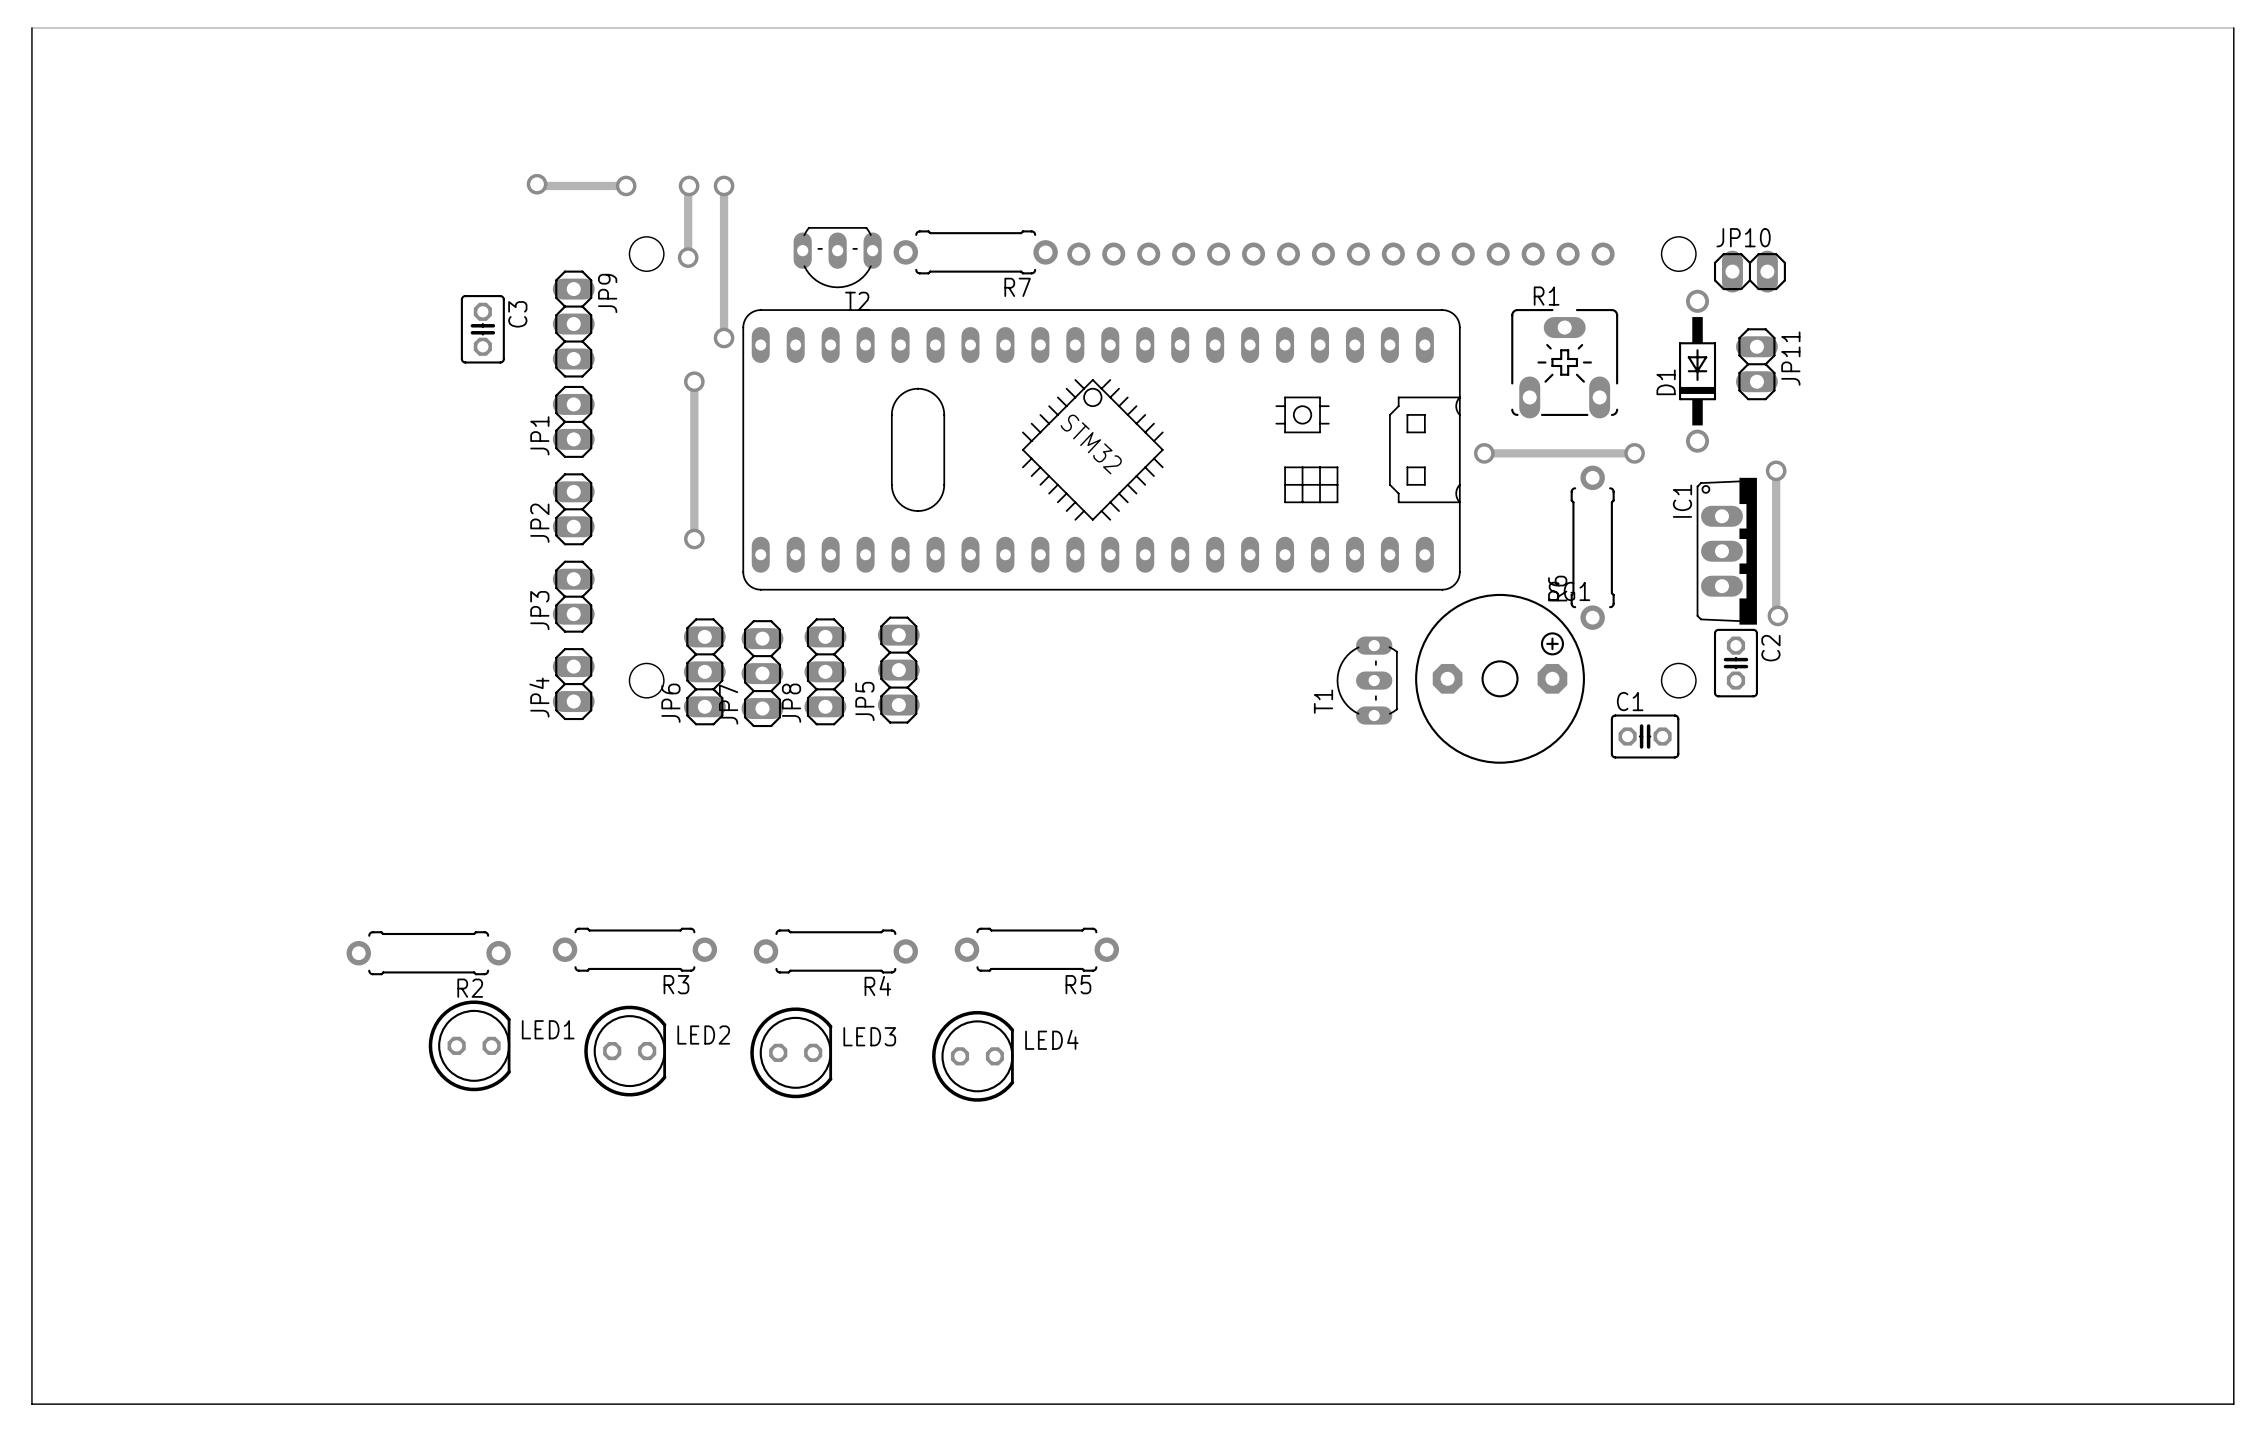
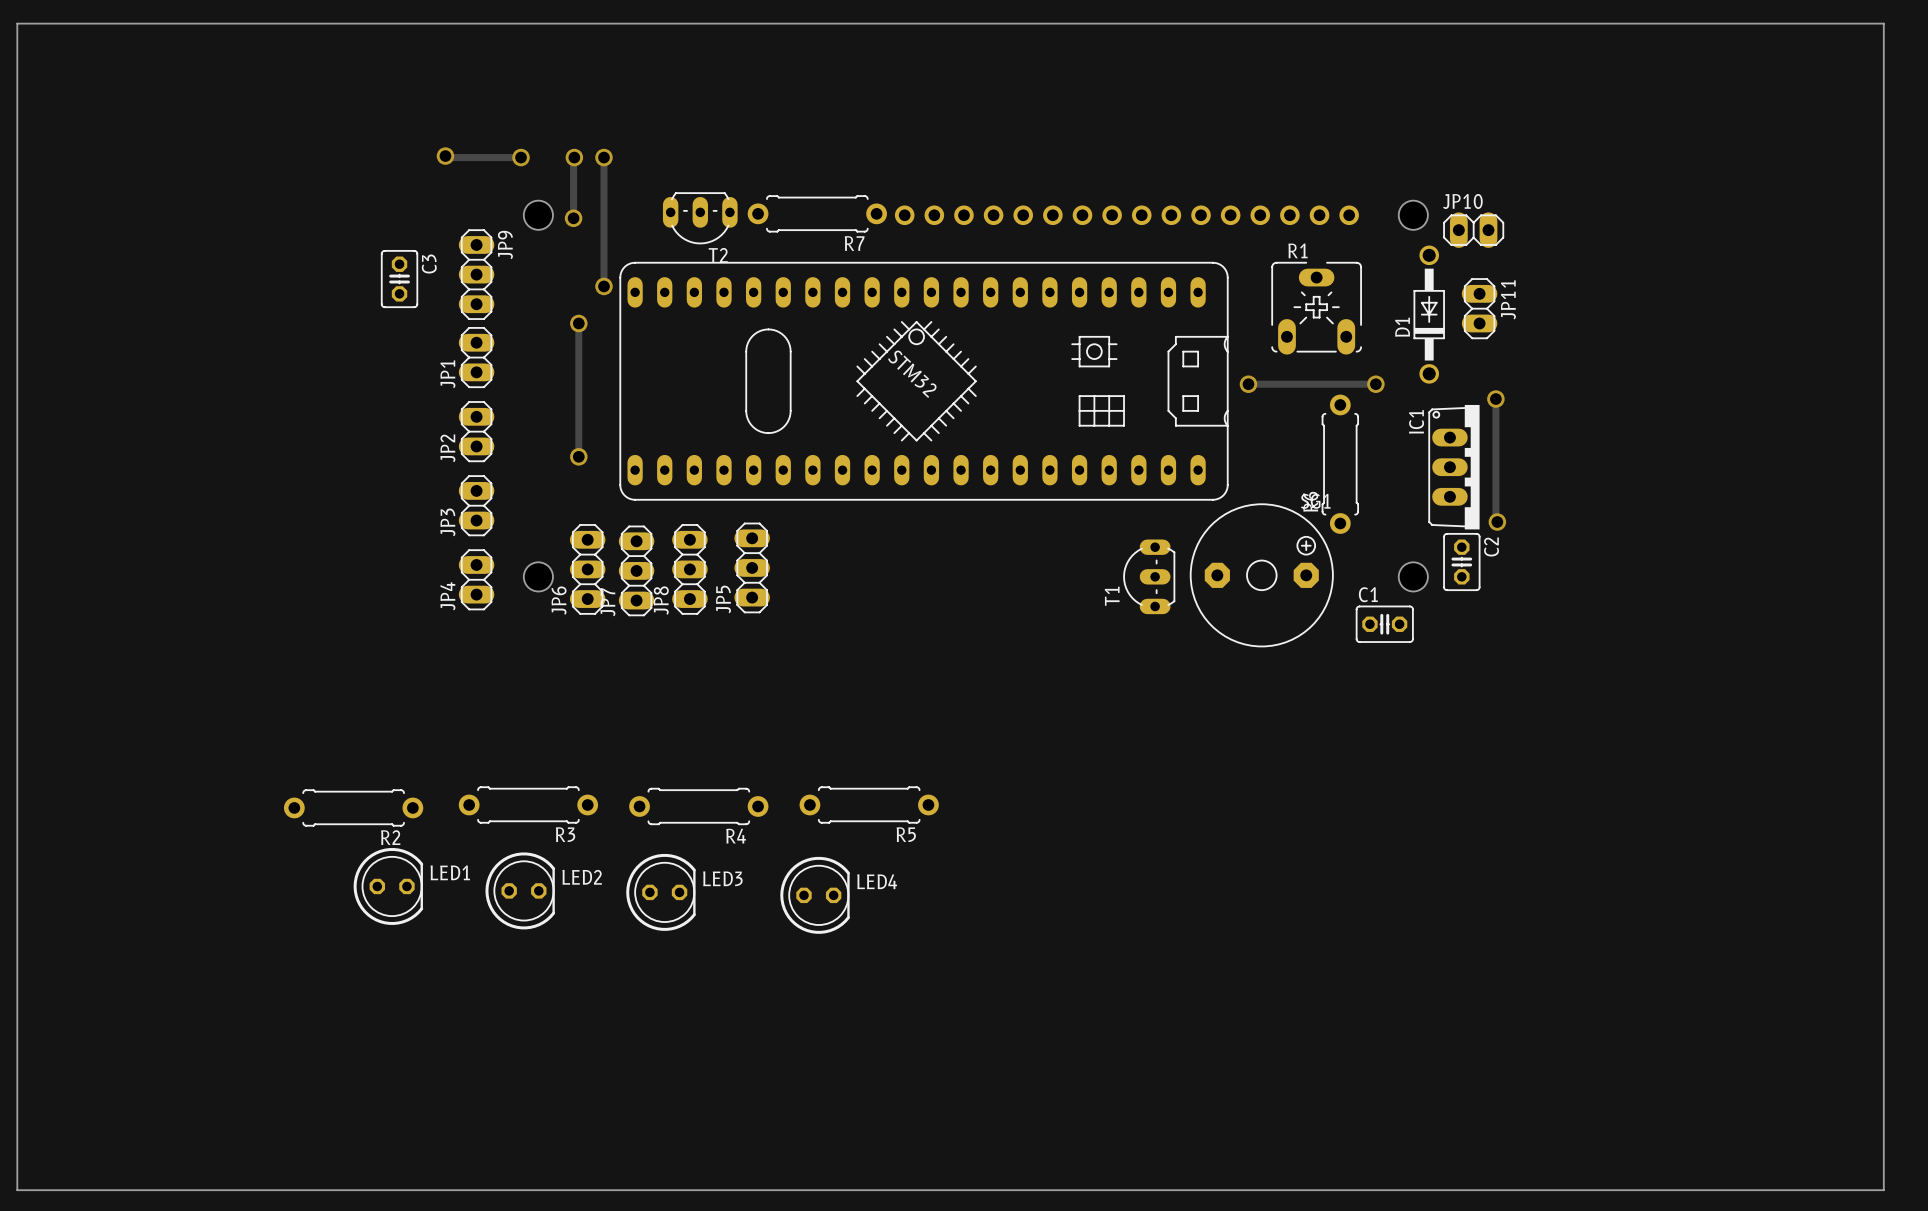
board edge: none -> (17, 23) (1883, 23)
track: (31, 27) (2233, 27) -> none

